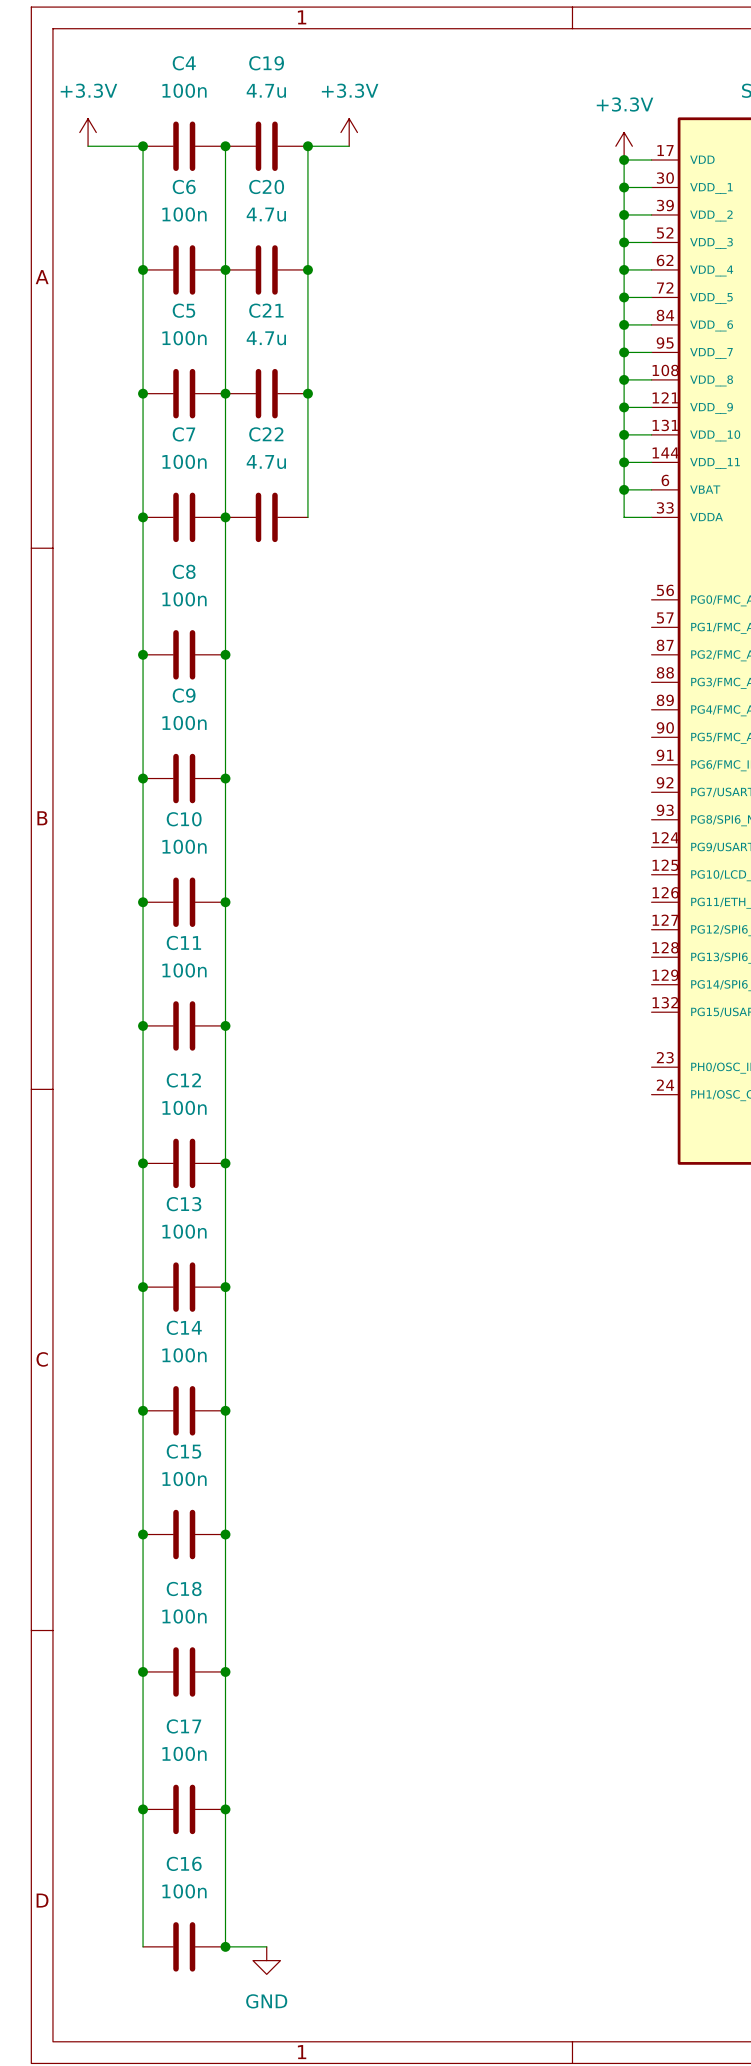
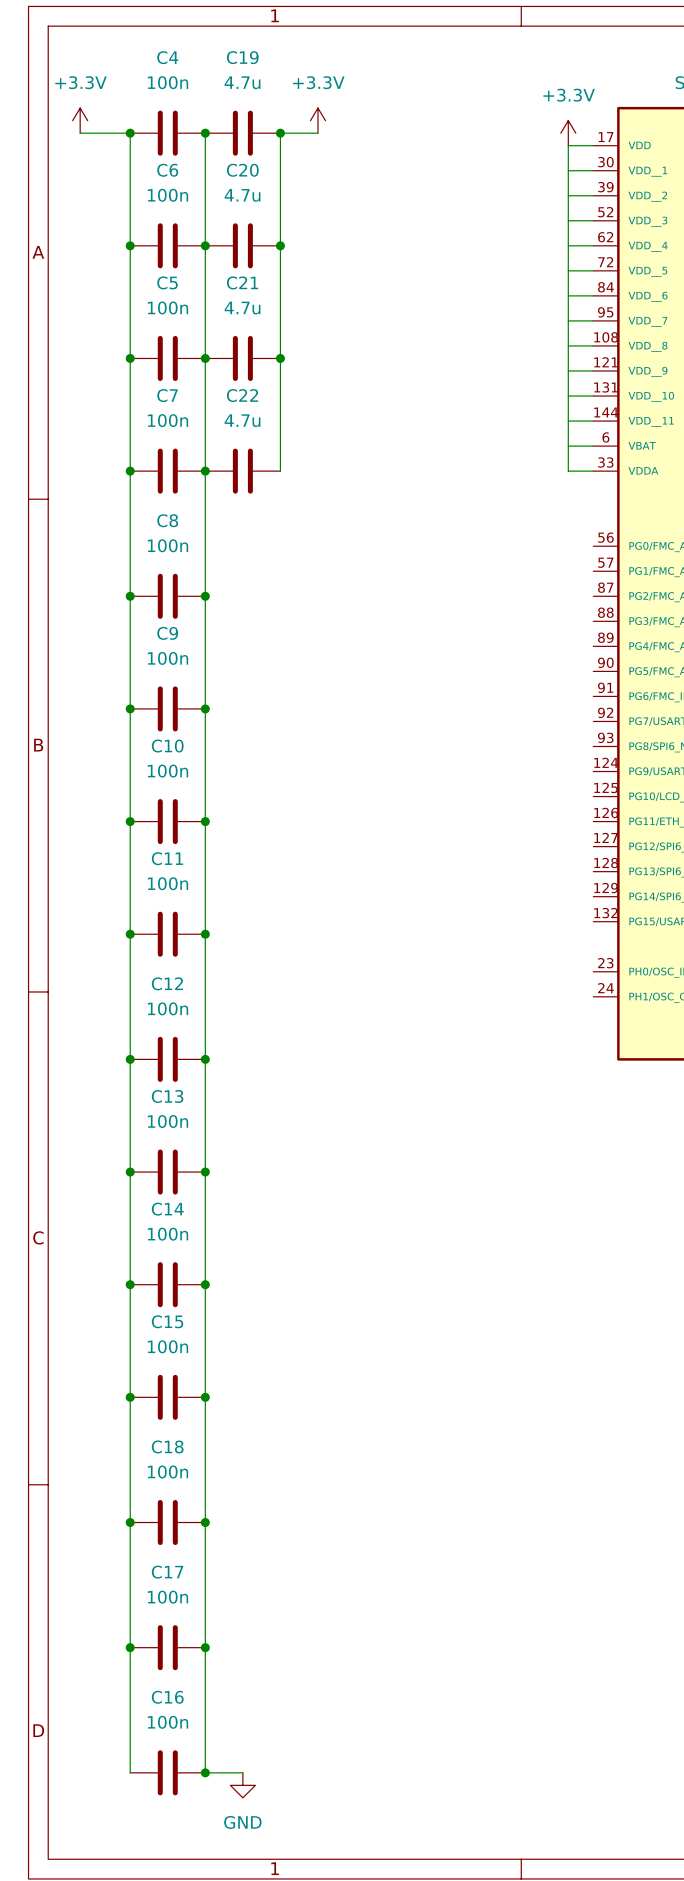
junction: (624, 160) -> none
junction: (624, 187) -> none
junction: (624, 214) -> none
junction: (624, 242) -> none
junction: (624, 269) -> none
junction: (624, 297) -> none
junction: (624, 324) -> none
junction: (624, 352) -> none
junction: (624, 379) -> none
junction: (624, 407) -> none
junction: (624, 434) -> none
junction: (624, 462) -> none
junction: (624, 489) -> none

